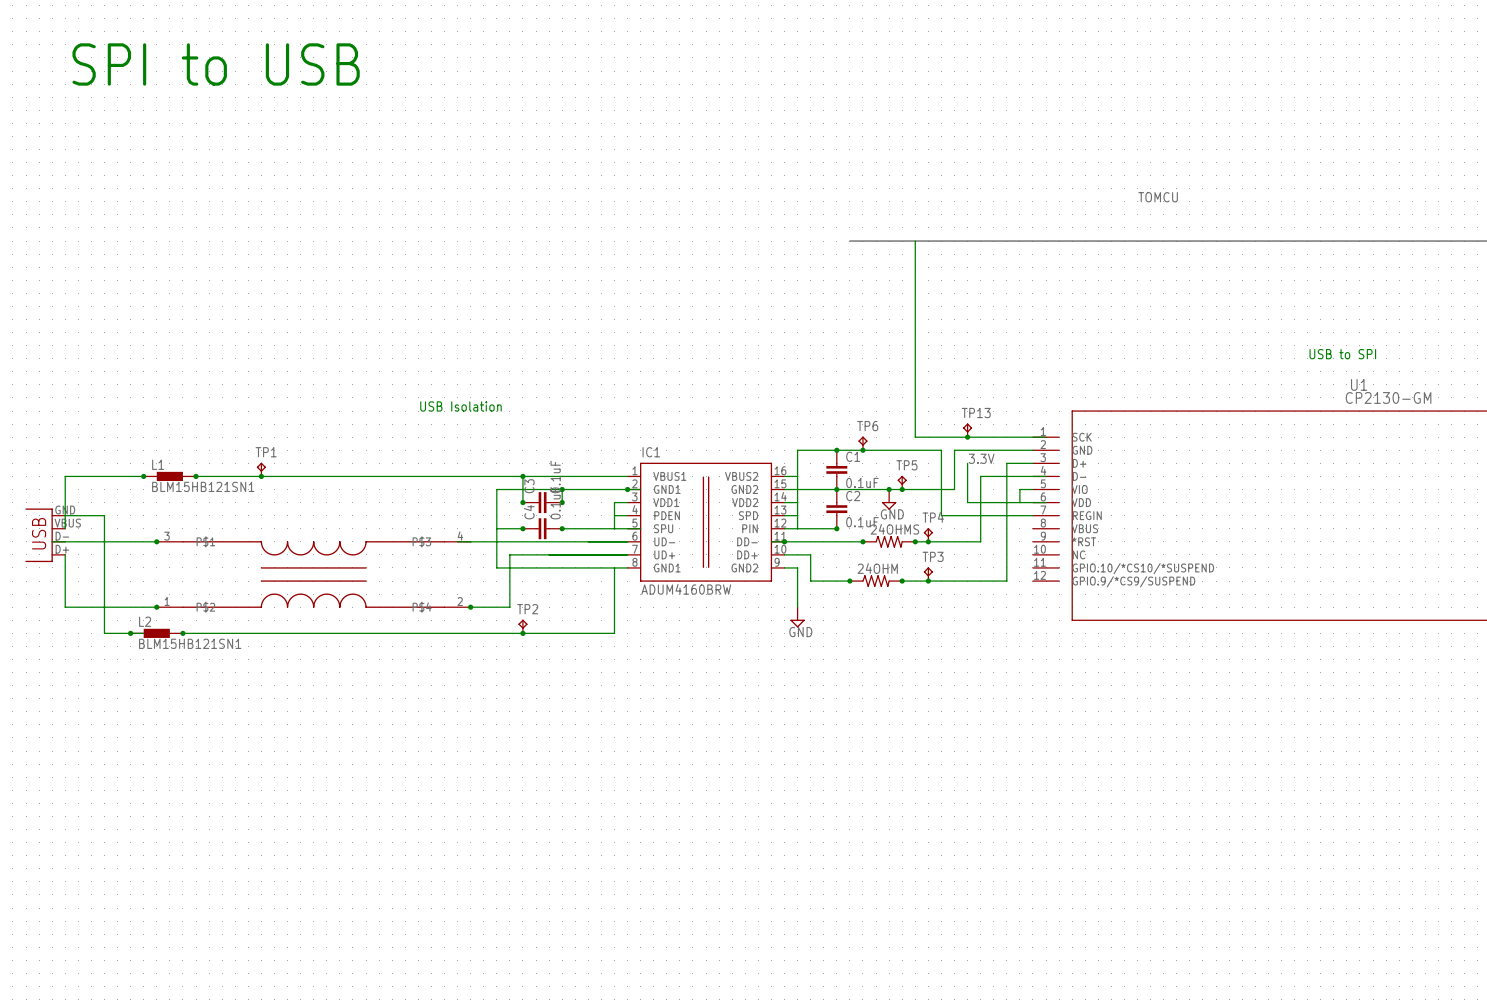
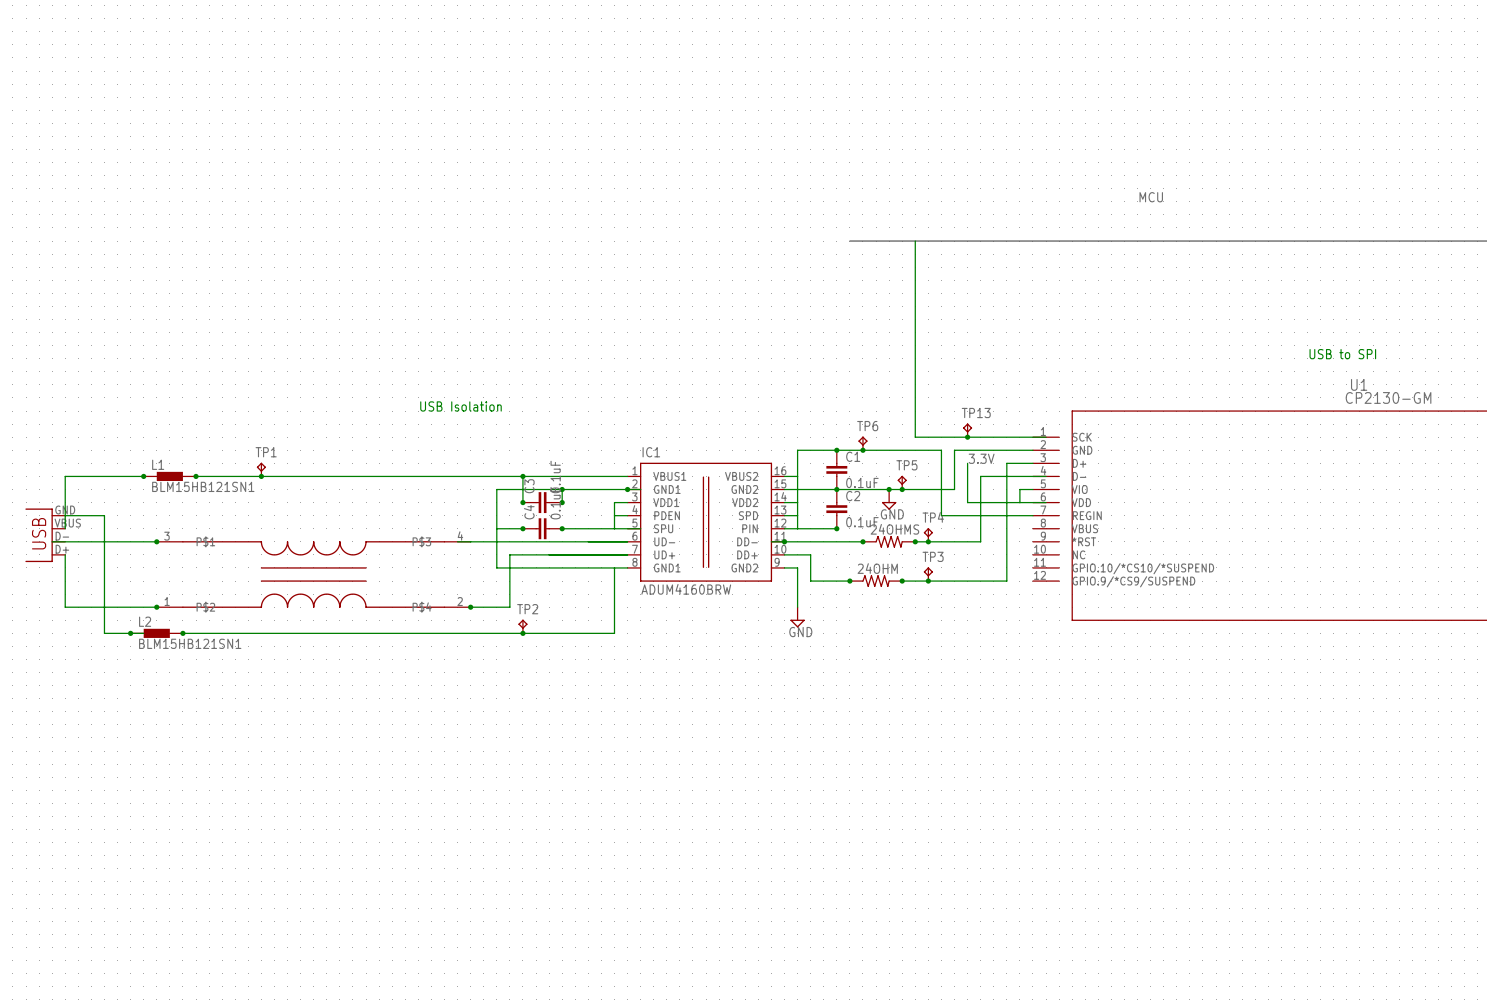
text: SPI to USB (216, 64) -> none
label: TOMCU (1158, 197) -> MCU (1151, 197)

